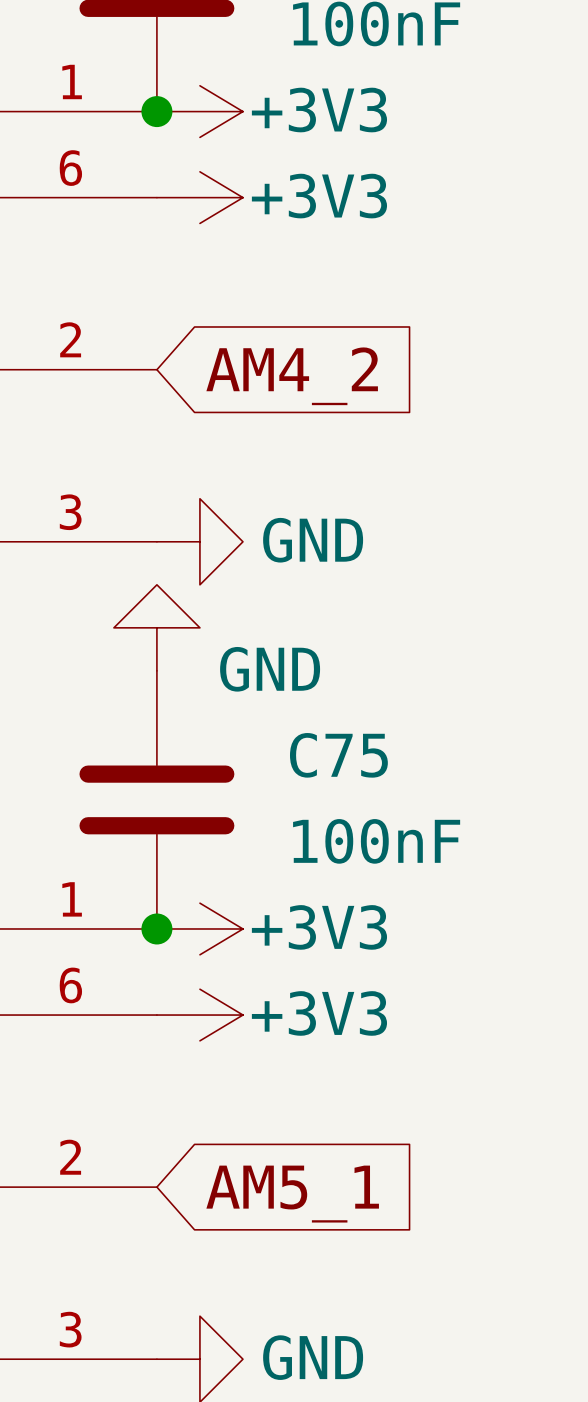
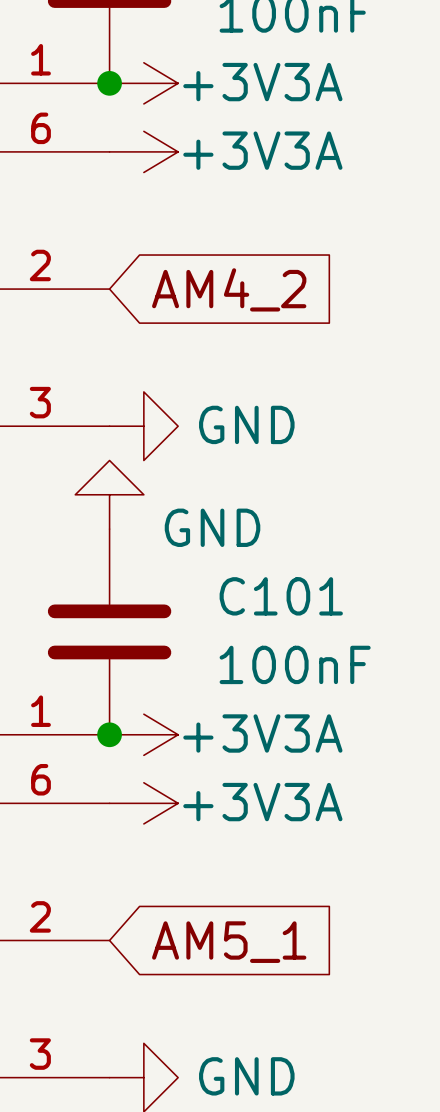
power symbol: +3V3 (199, 111) -> +3V3A (143, 83)
power symbol: +3V3 (199, 197) -> +3V3A (143, 151)
C75 name: C75 (338, 755) -> C101 (281, 596)
power symbol: +3V3 (199, 928) -> +3V3A (143, 734)
power symbol: +3V3 (199, 1015) -> +3V3A (143, 803)

